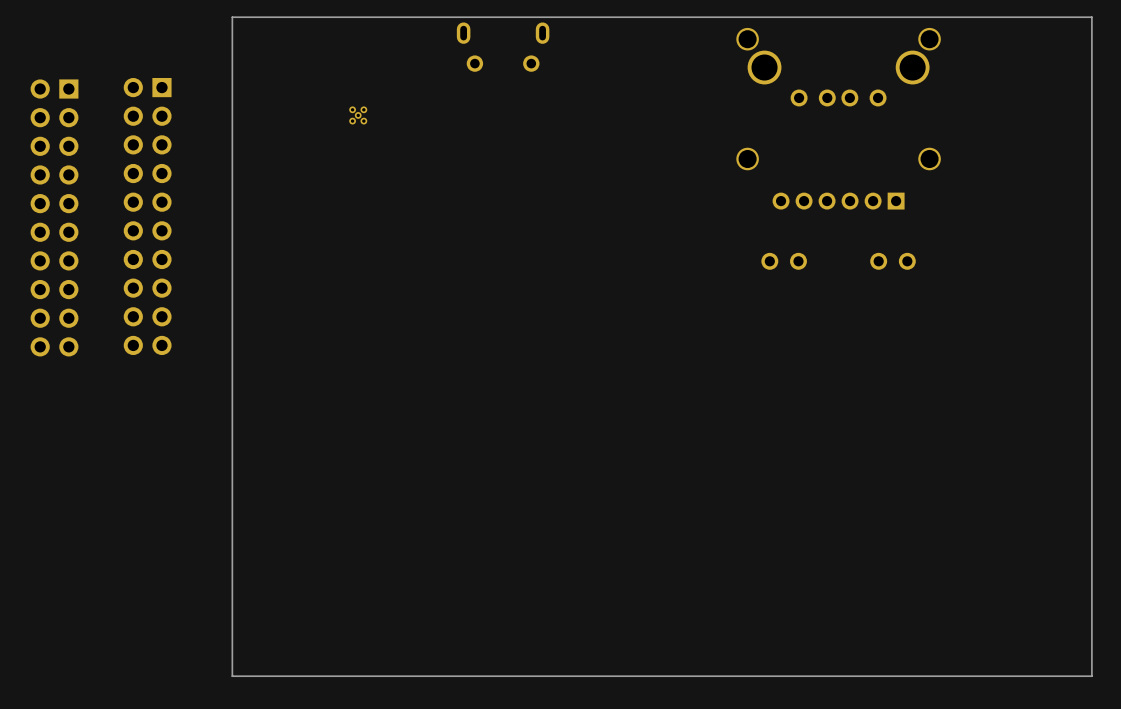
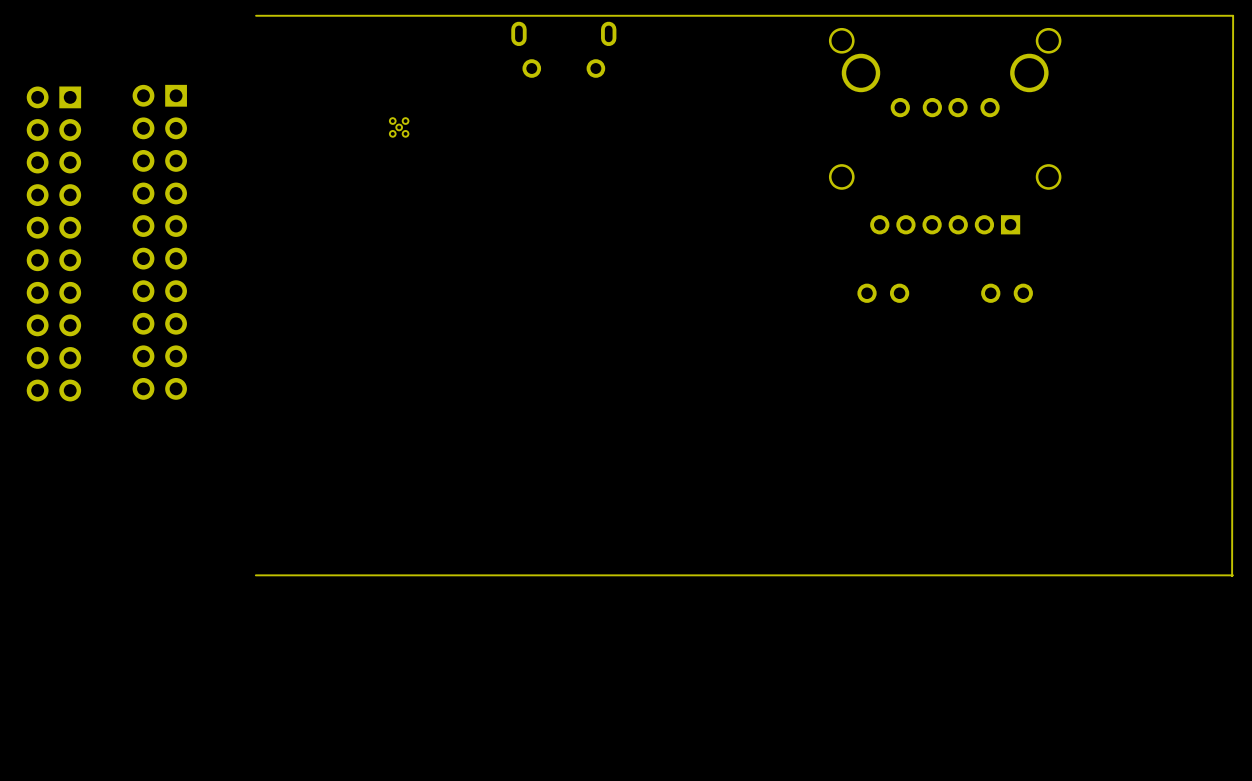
board edge: (1091, 17) (1091, 676) (232, 676) (232, 17) -> (1233, 15) (1232, 576)
board edge: none -> (1232, 575) (255, 575)

